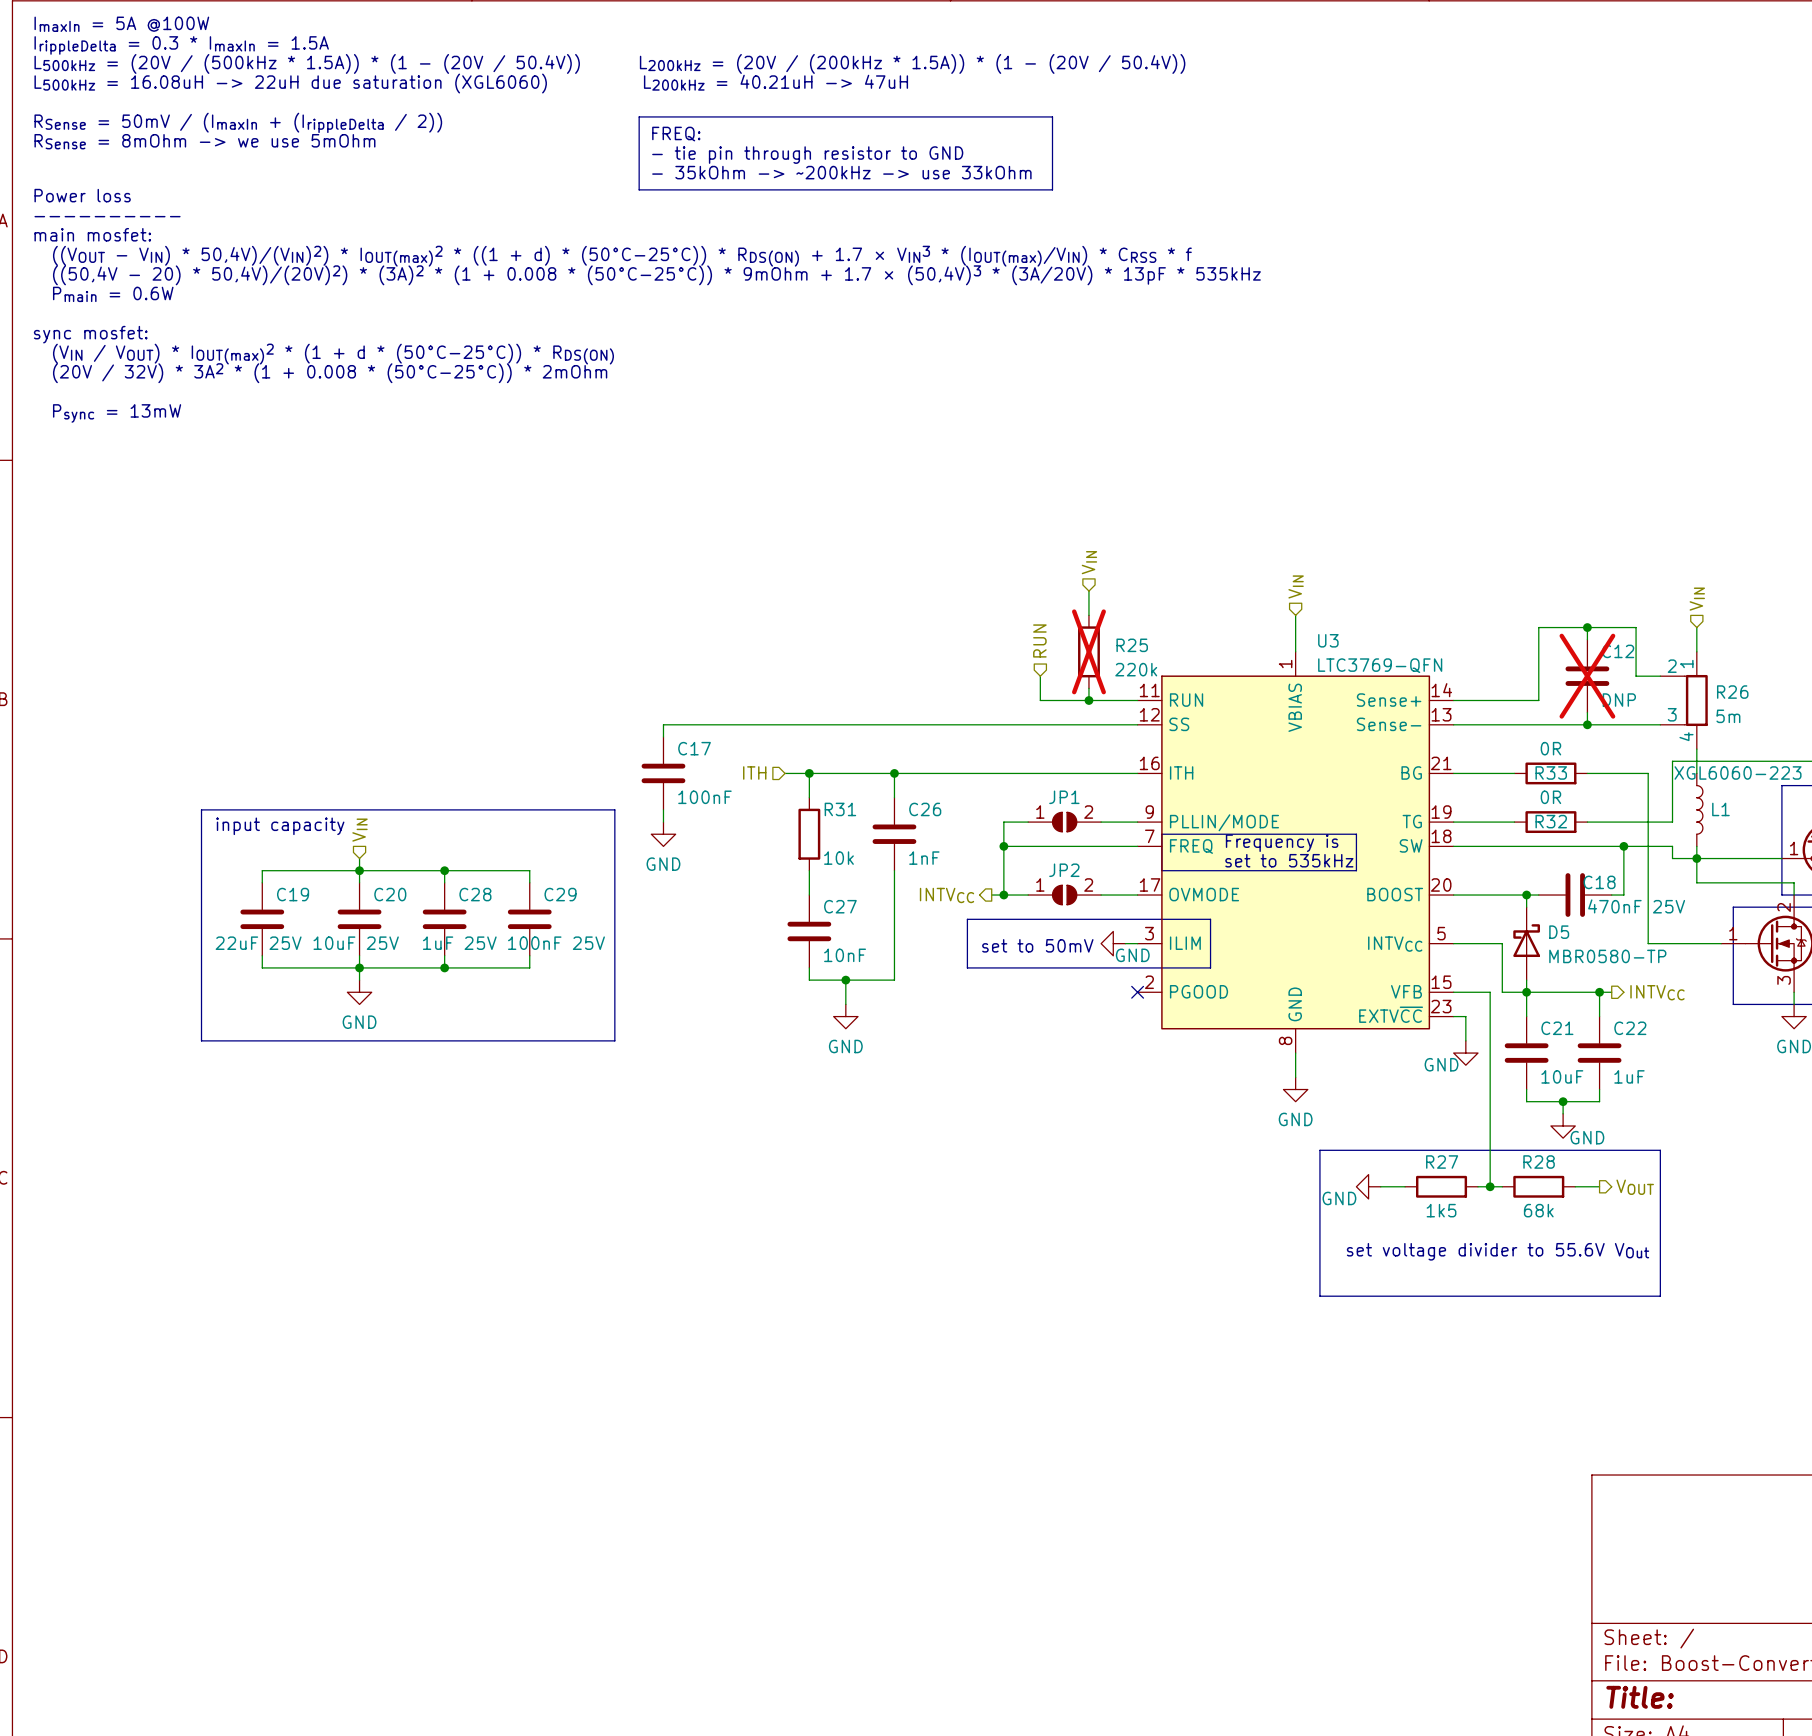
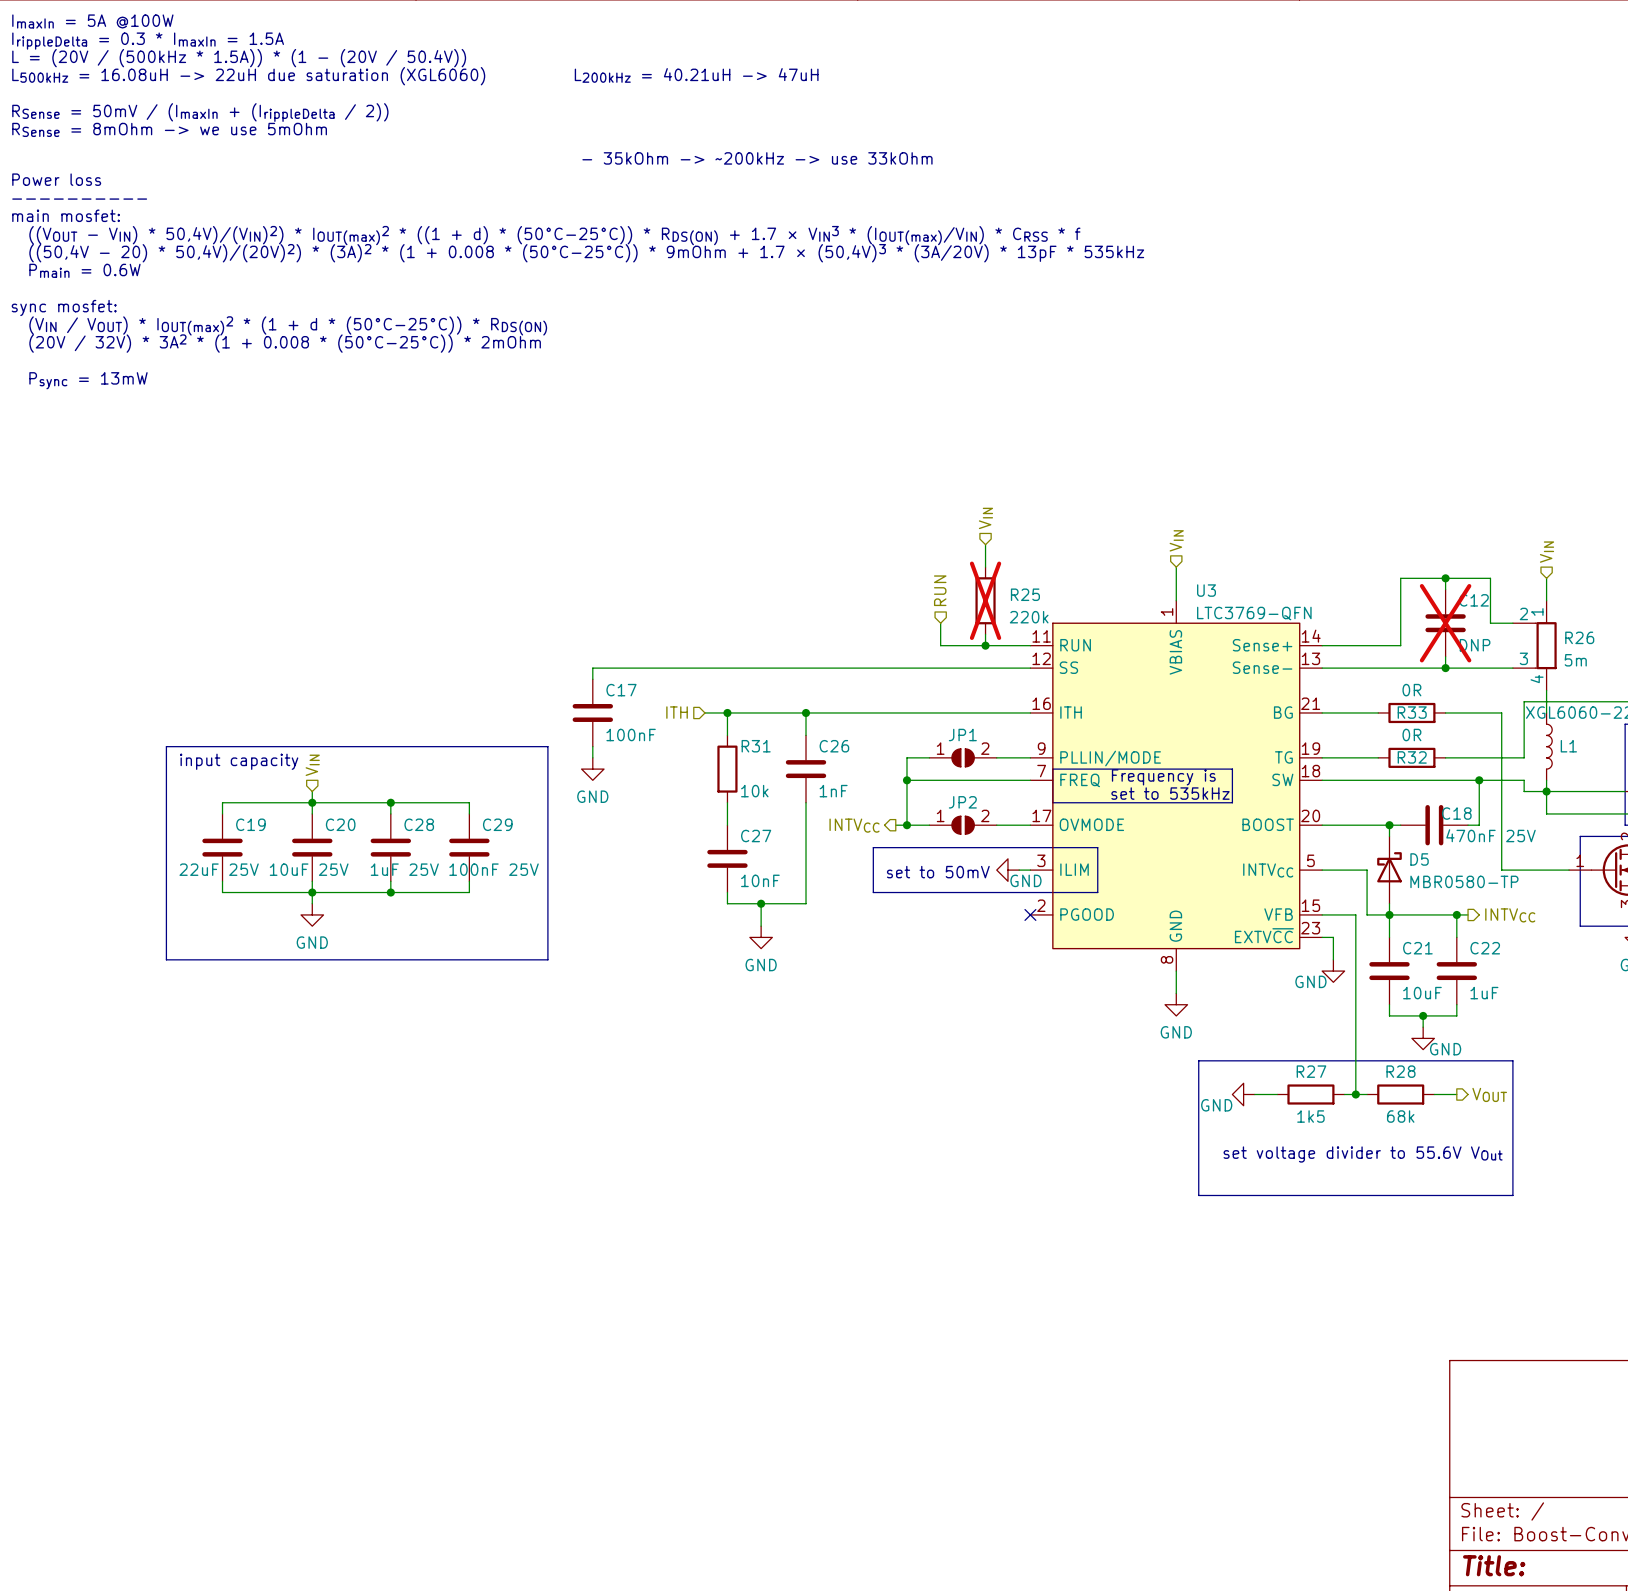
text: L500kHz = (20V / (500kHz * 1.5A)) * (1 - (20V / 50.4V)) L200kHz = (20V / (200kHz * 1.5A)) * (1 - (20V / 50.4V)) (609, 63) -> L = (20V / (500kHz * 1.5A)) * (1 - (20V / 50.4V)) (239, 58)
line: (639, 116) (1052, 116) (1052, 189) (639, 189) (639, 116) -> none
text: FREQ: (676, 134) -> none
text: - tie pin through resistor to GND (807, 155) -> none

